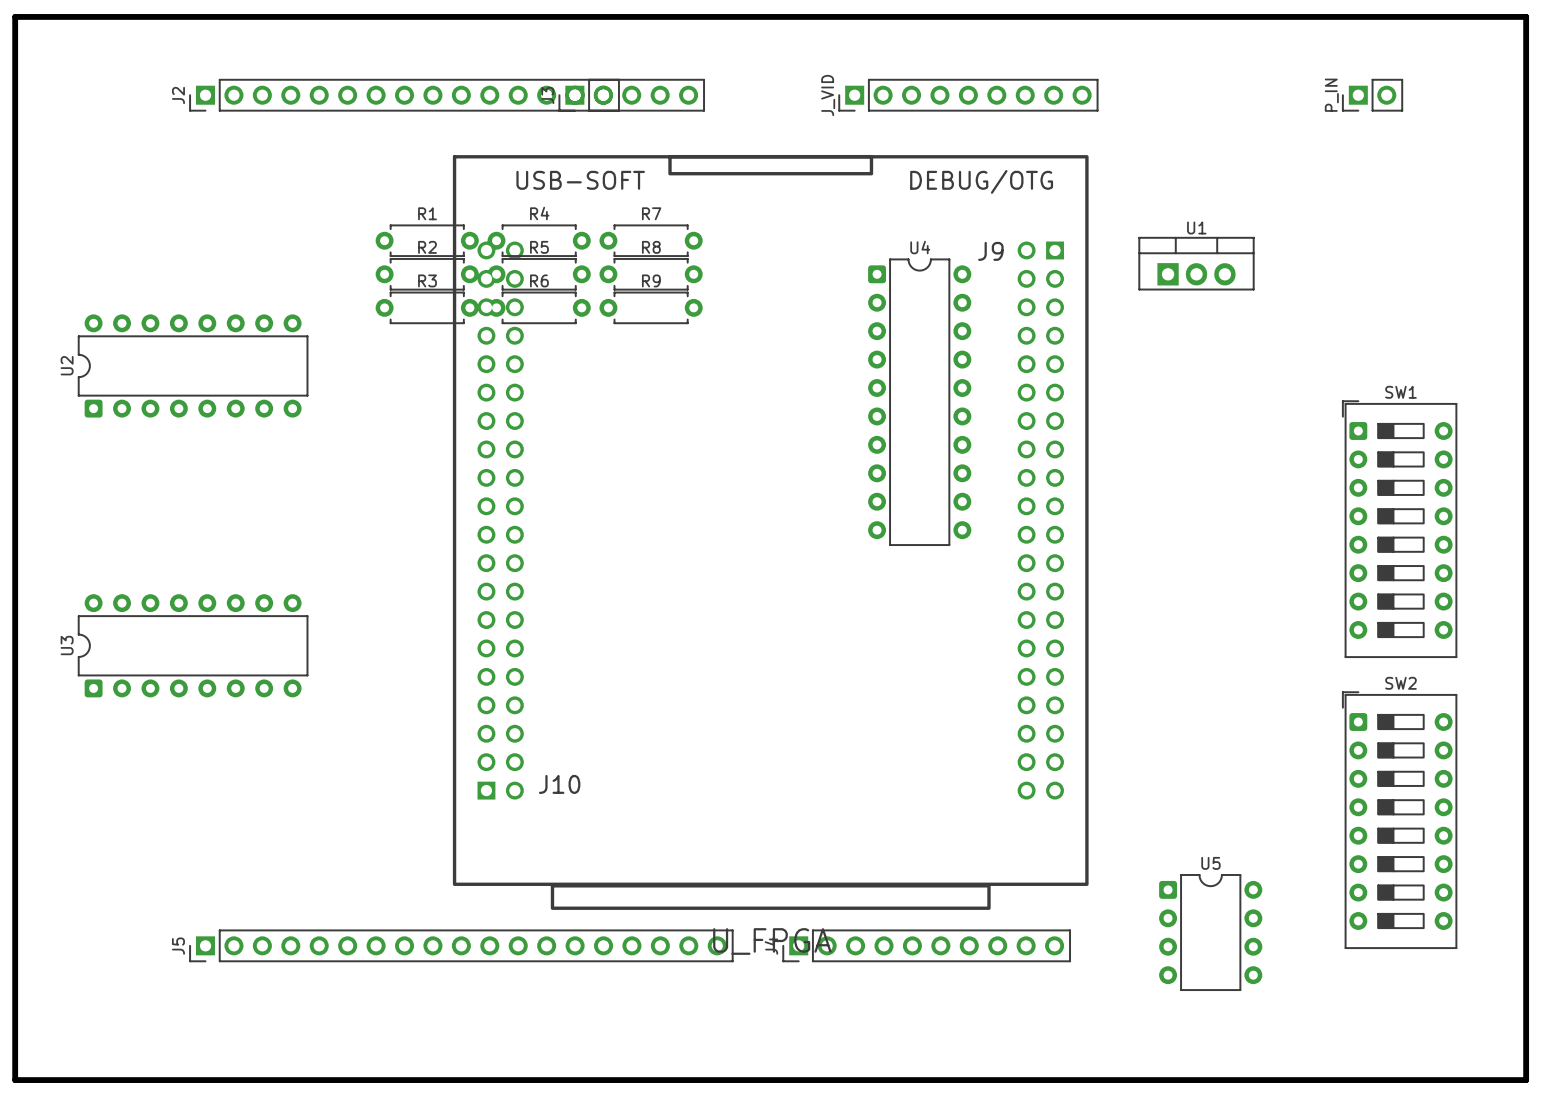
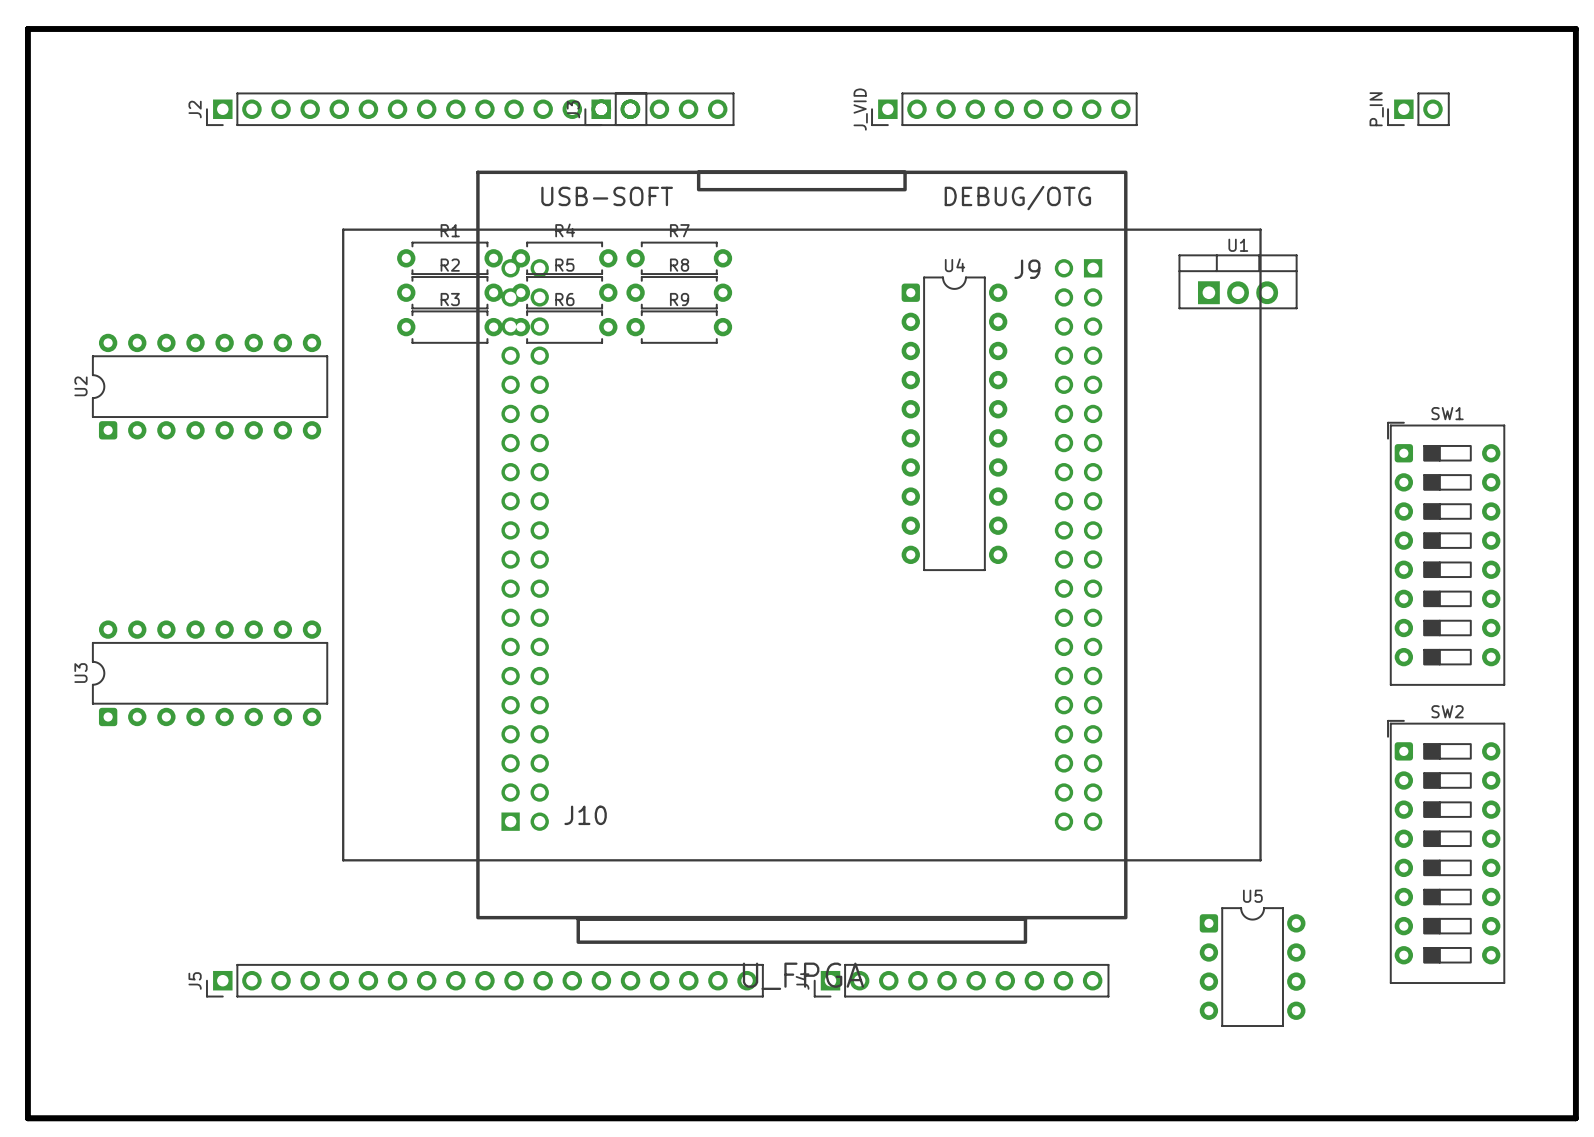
line: none -> (343, 229) (1260, 229) (1260, 860) (343, 860) (343, 229)

